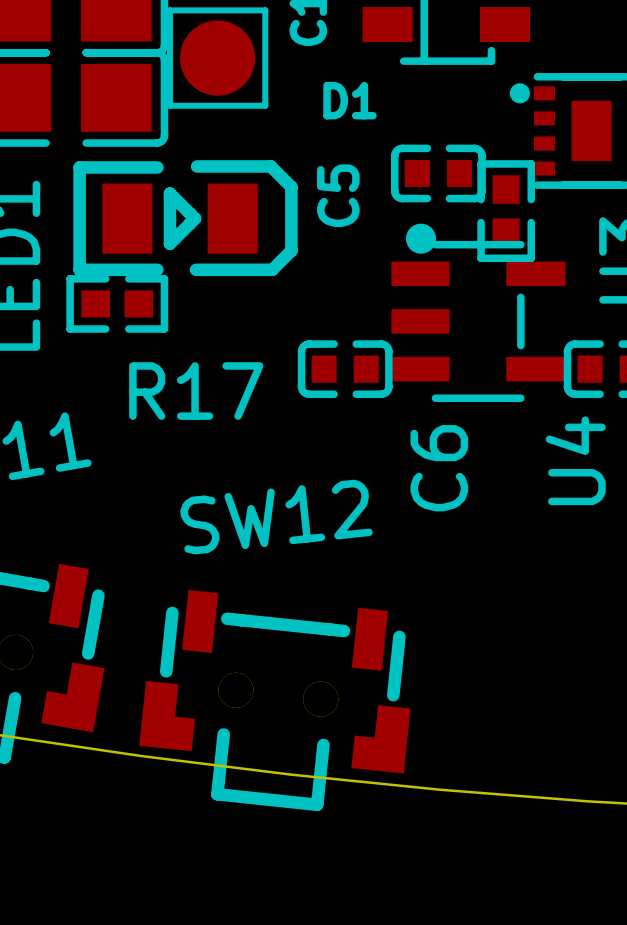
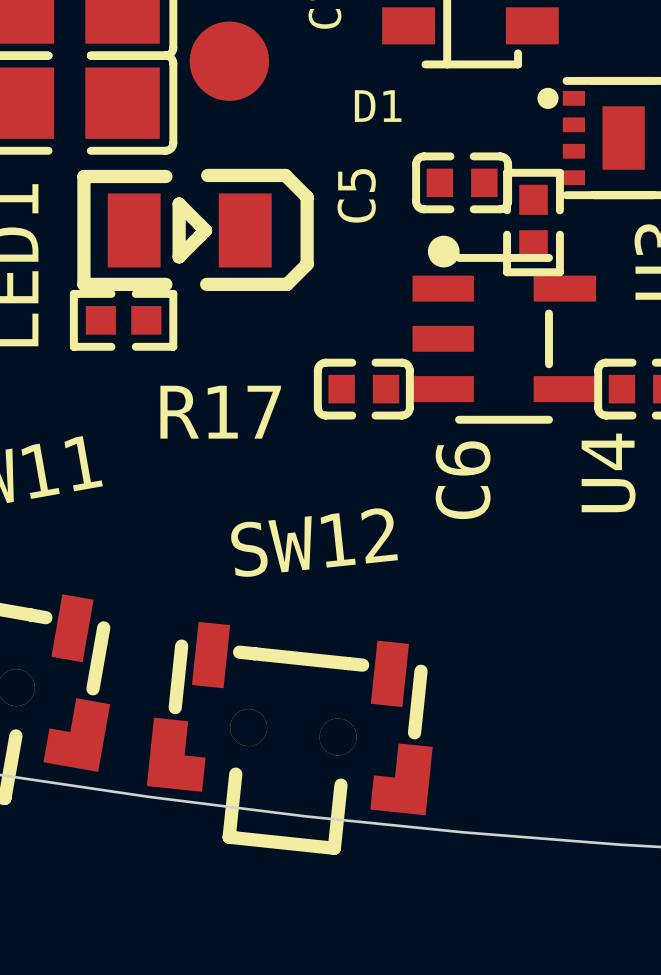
part footprint: [166, 7, 269, 109] -> [189, 21, 270, 101]

